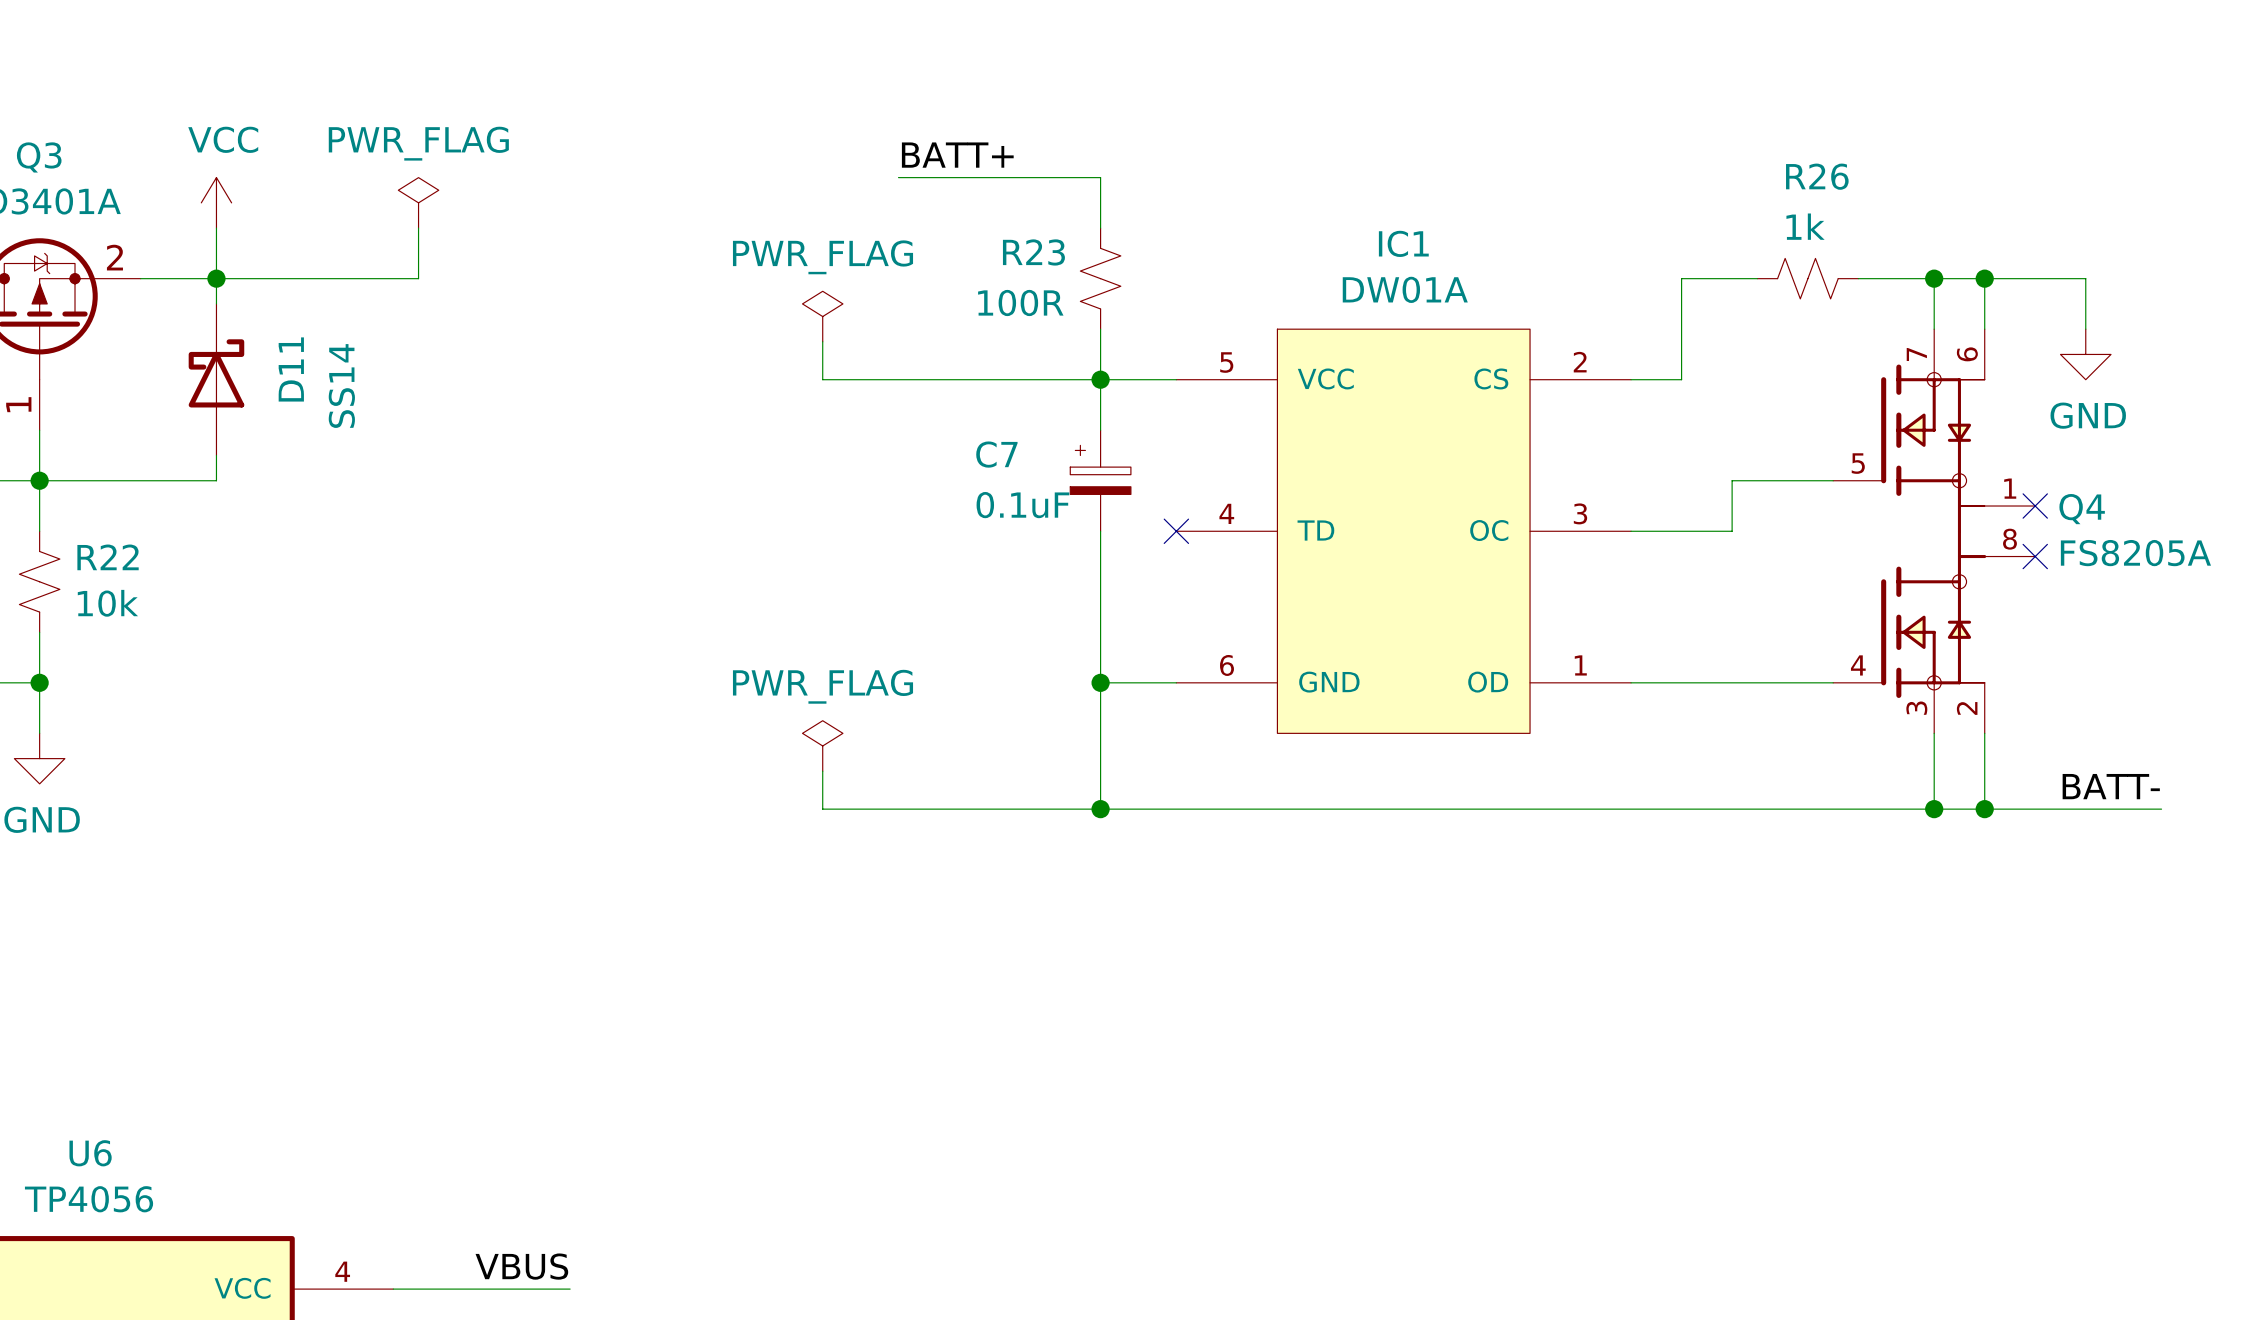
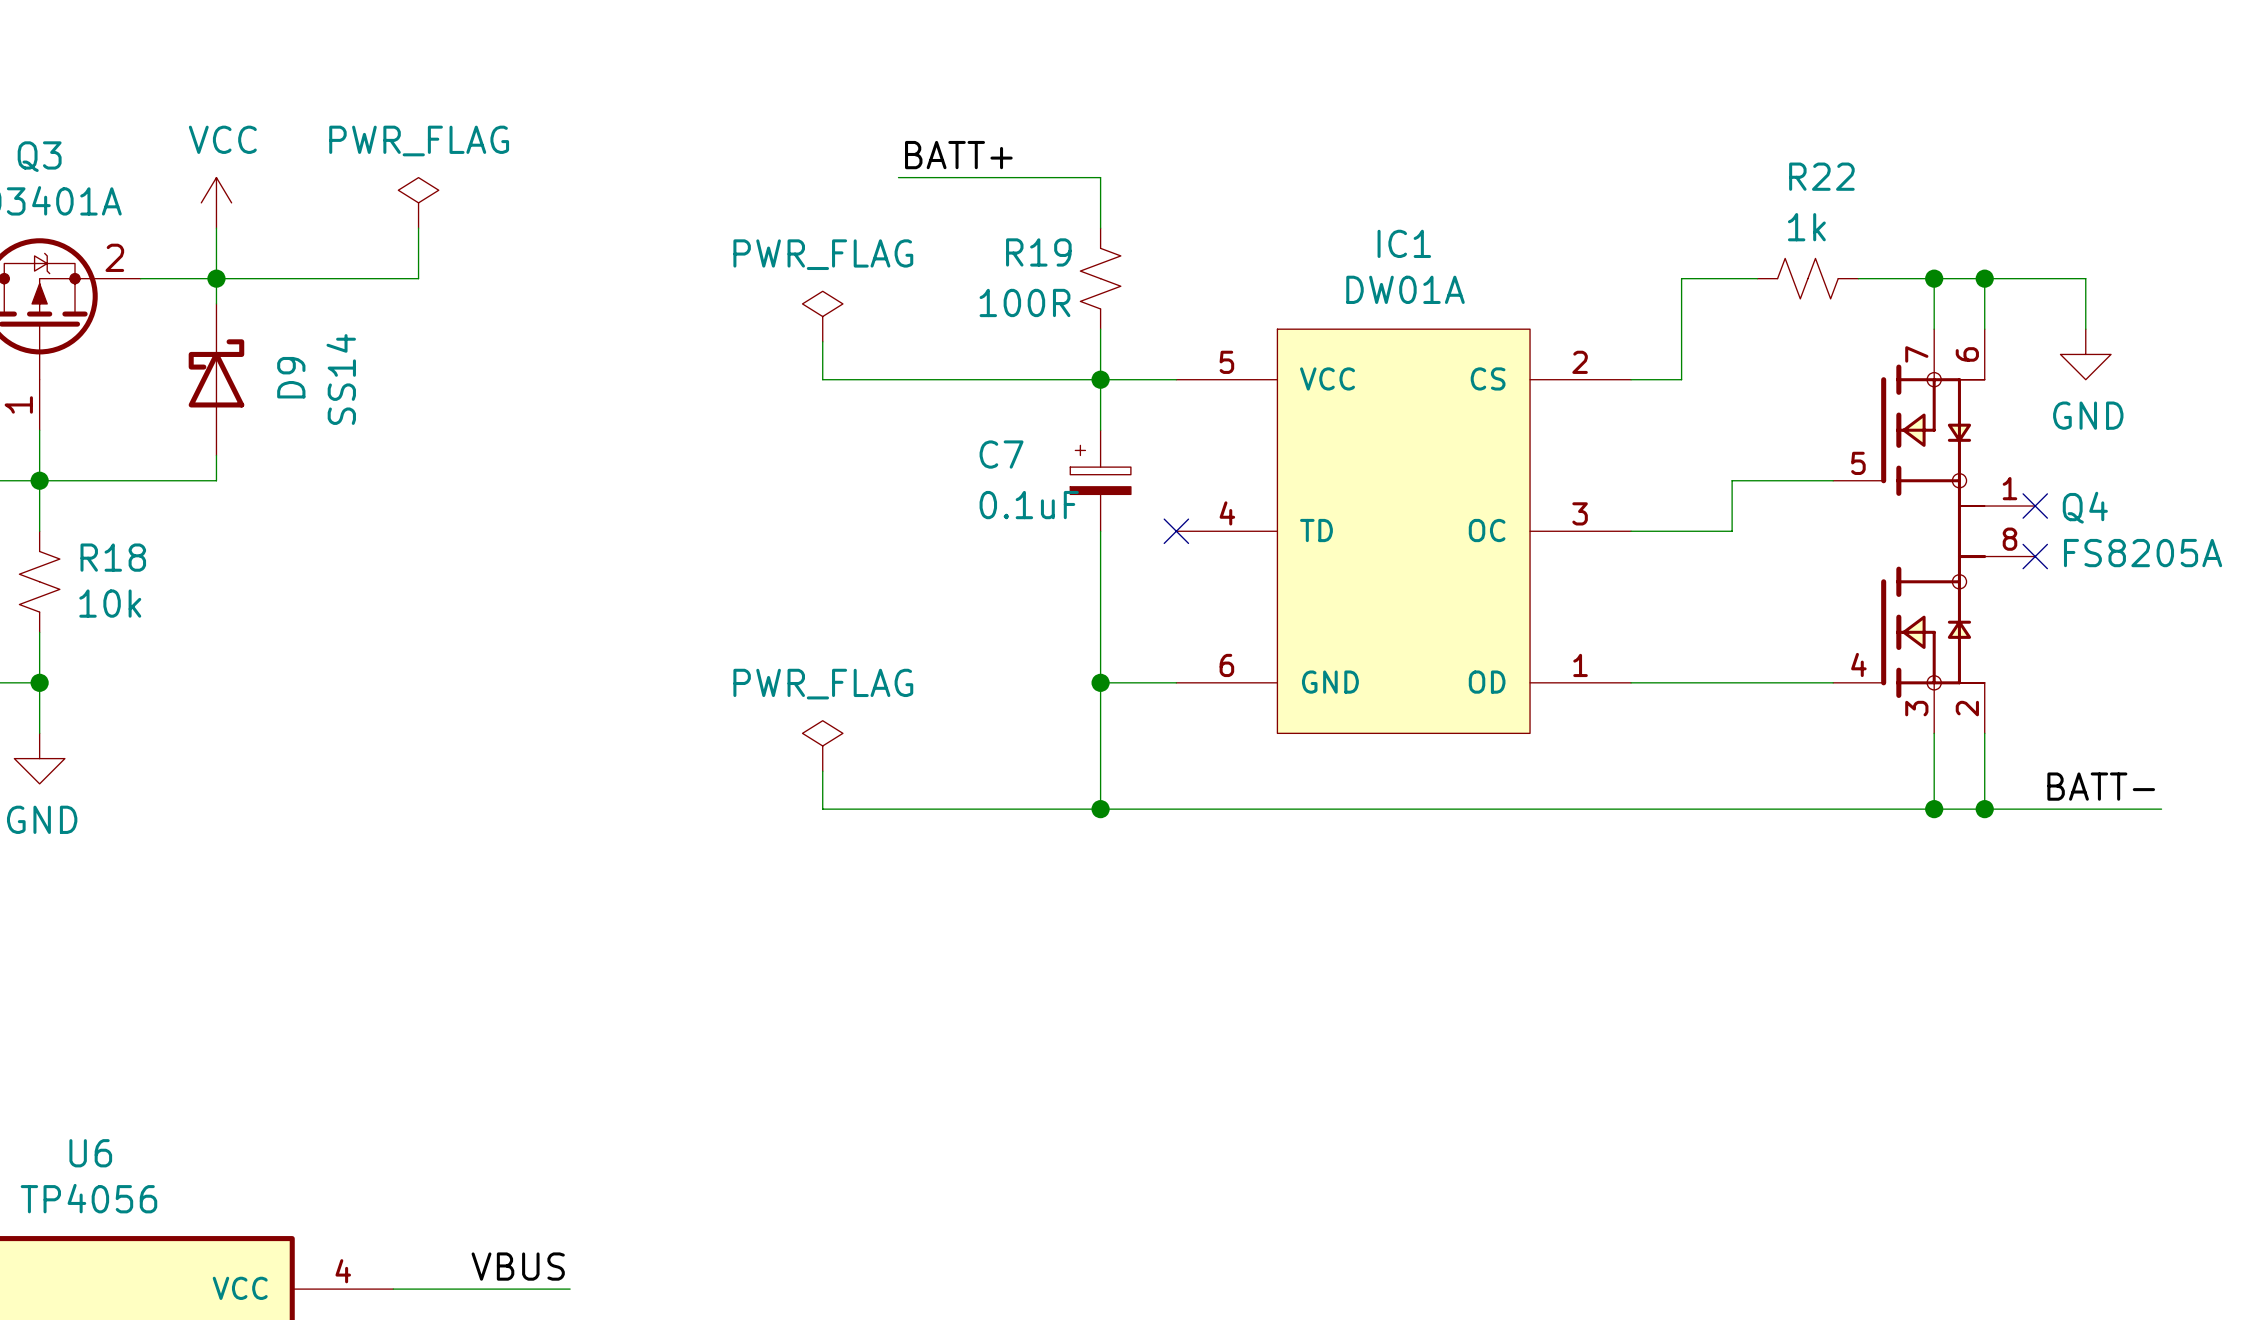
R26 name: R26 (1817, 176) -> R22 (1821, 176)
R23 name: R23 (1033, 252) -> R19 (1038, 252)
D11 name: D11 (291, 369) -> D9 (291, 377)
R22 name: R22 (108, 557) -> R18 (113, 557)

